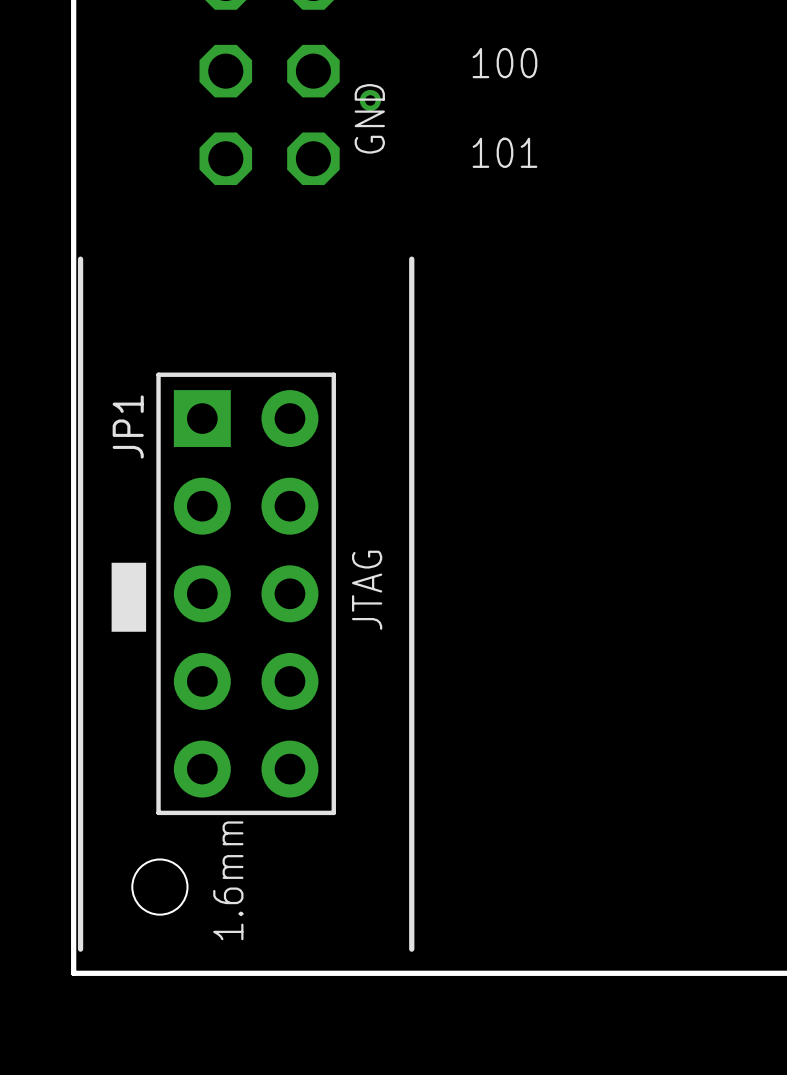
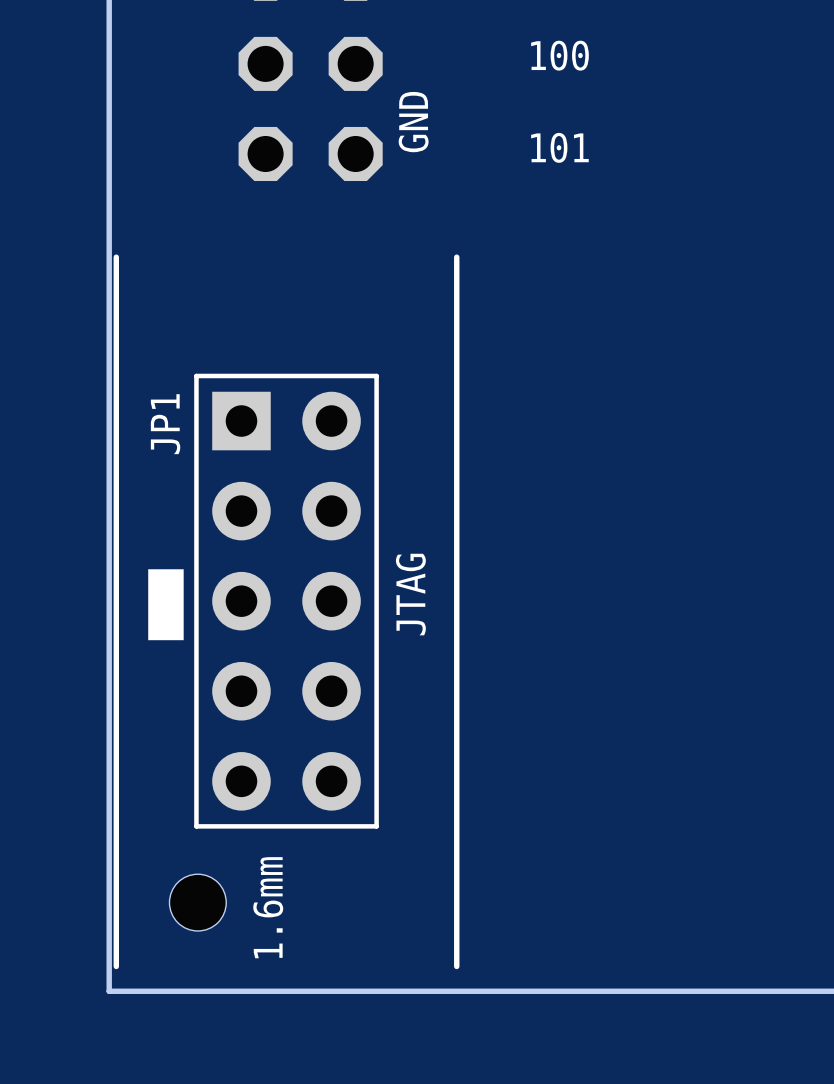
via: (370, 100) -> none

